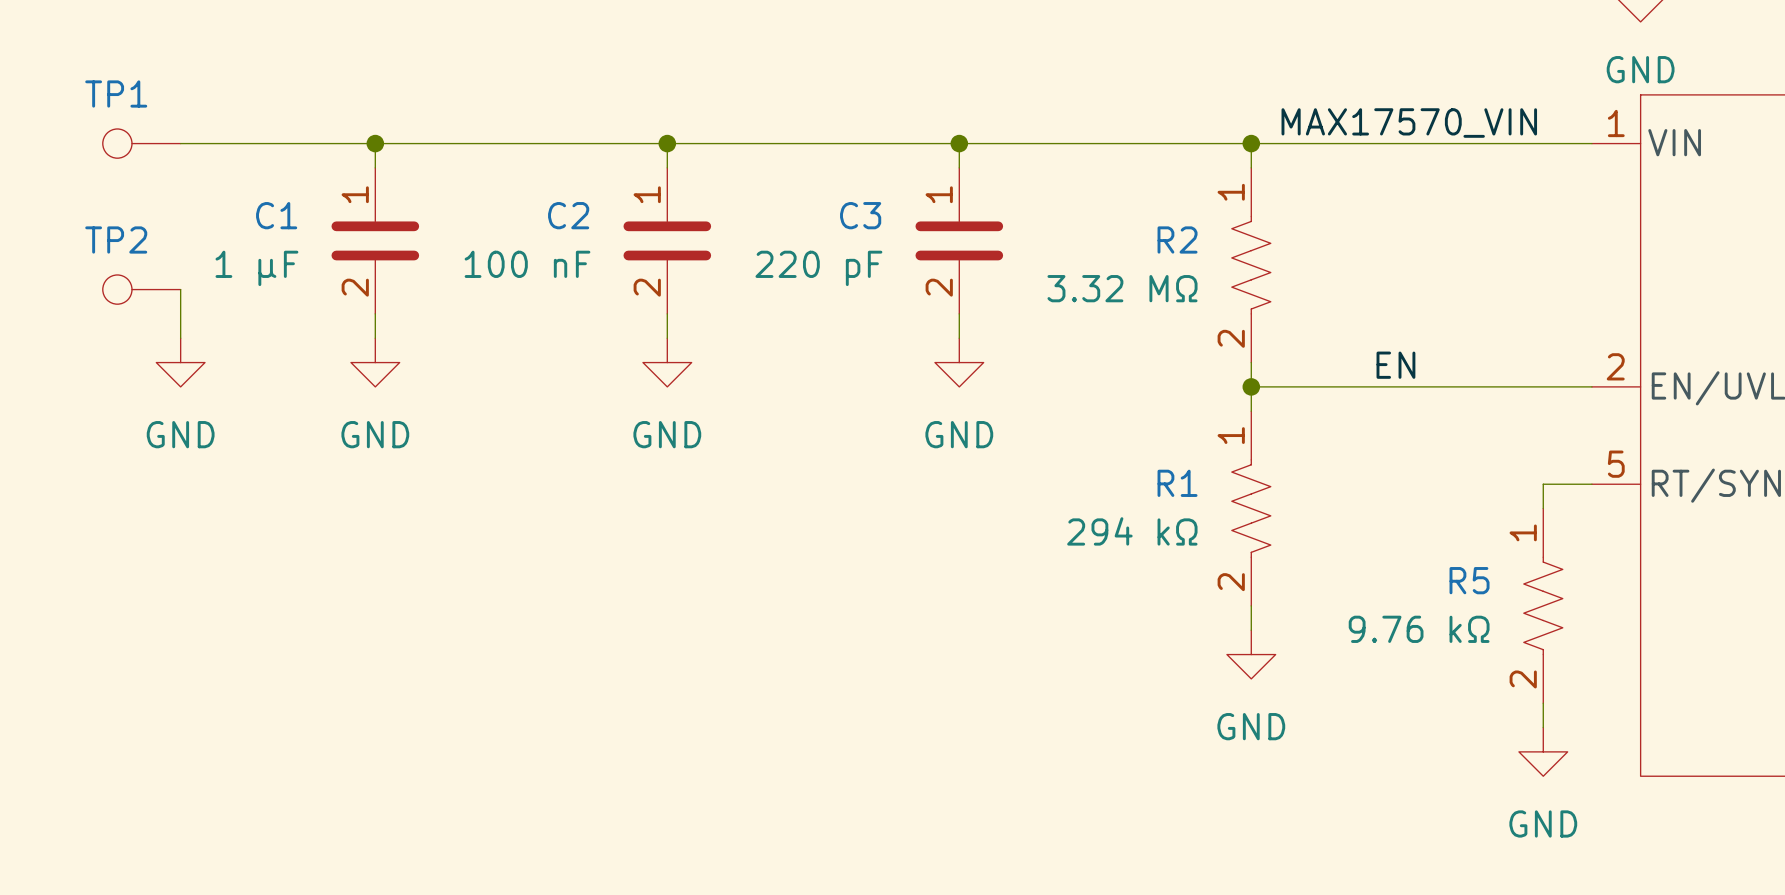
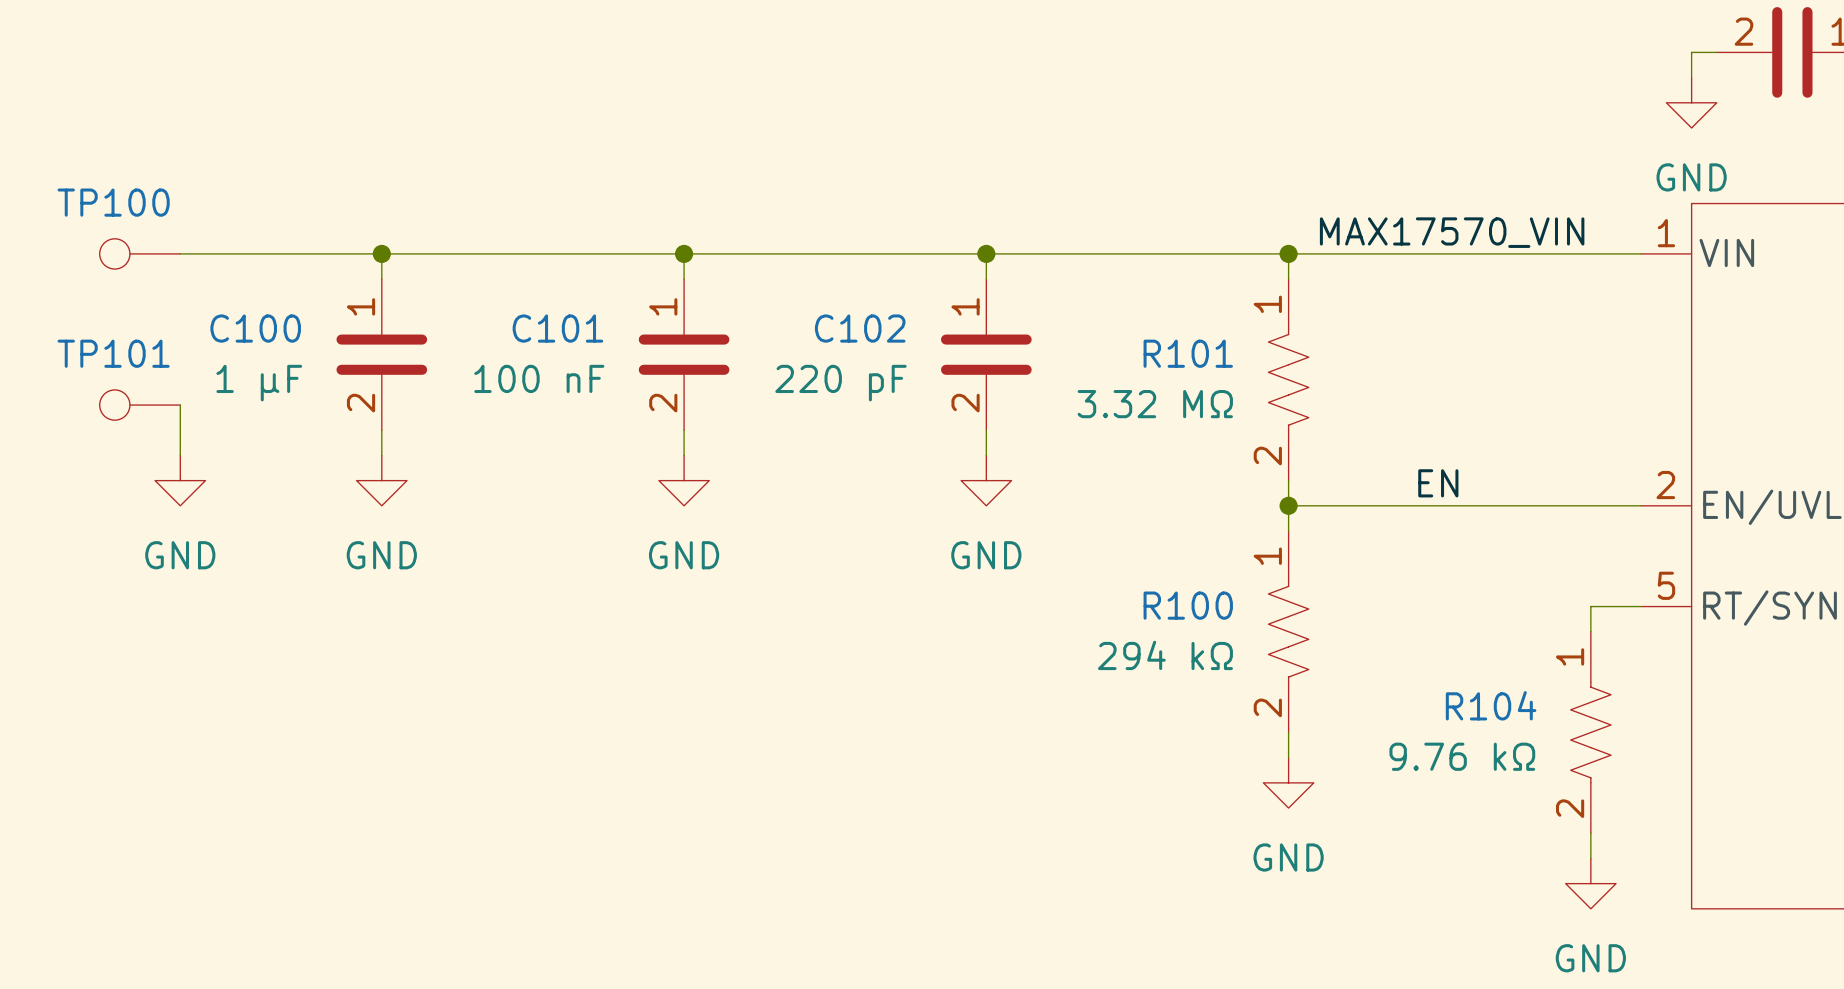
TP1 name: TP1 (116, 94) -> TP100 (113, 202)
C1 name: C1 (276, 215) -> C100 (255, 328)
C2 name: C2 (568, 215) -> C101 (557, 328)
C3 name: C3 (860, 215) -> C102 (860, 328)
R2 name: R2 (1177, 239) -> R101 (1188, 353)
TP2 name: TP2 (116, 240) -> TP101 (113, 353)
R1 name: R1 (1177, 483) -> R100 (1188, 605)
R5 name: R5 (1469, 580) -> R104 (1491, 705)

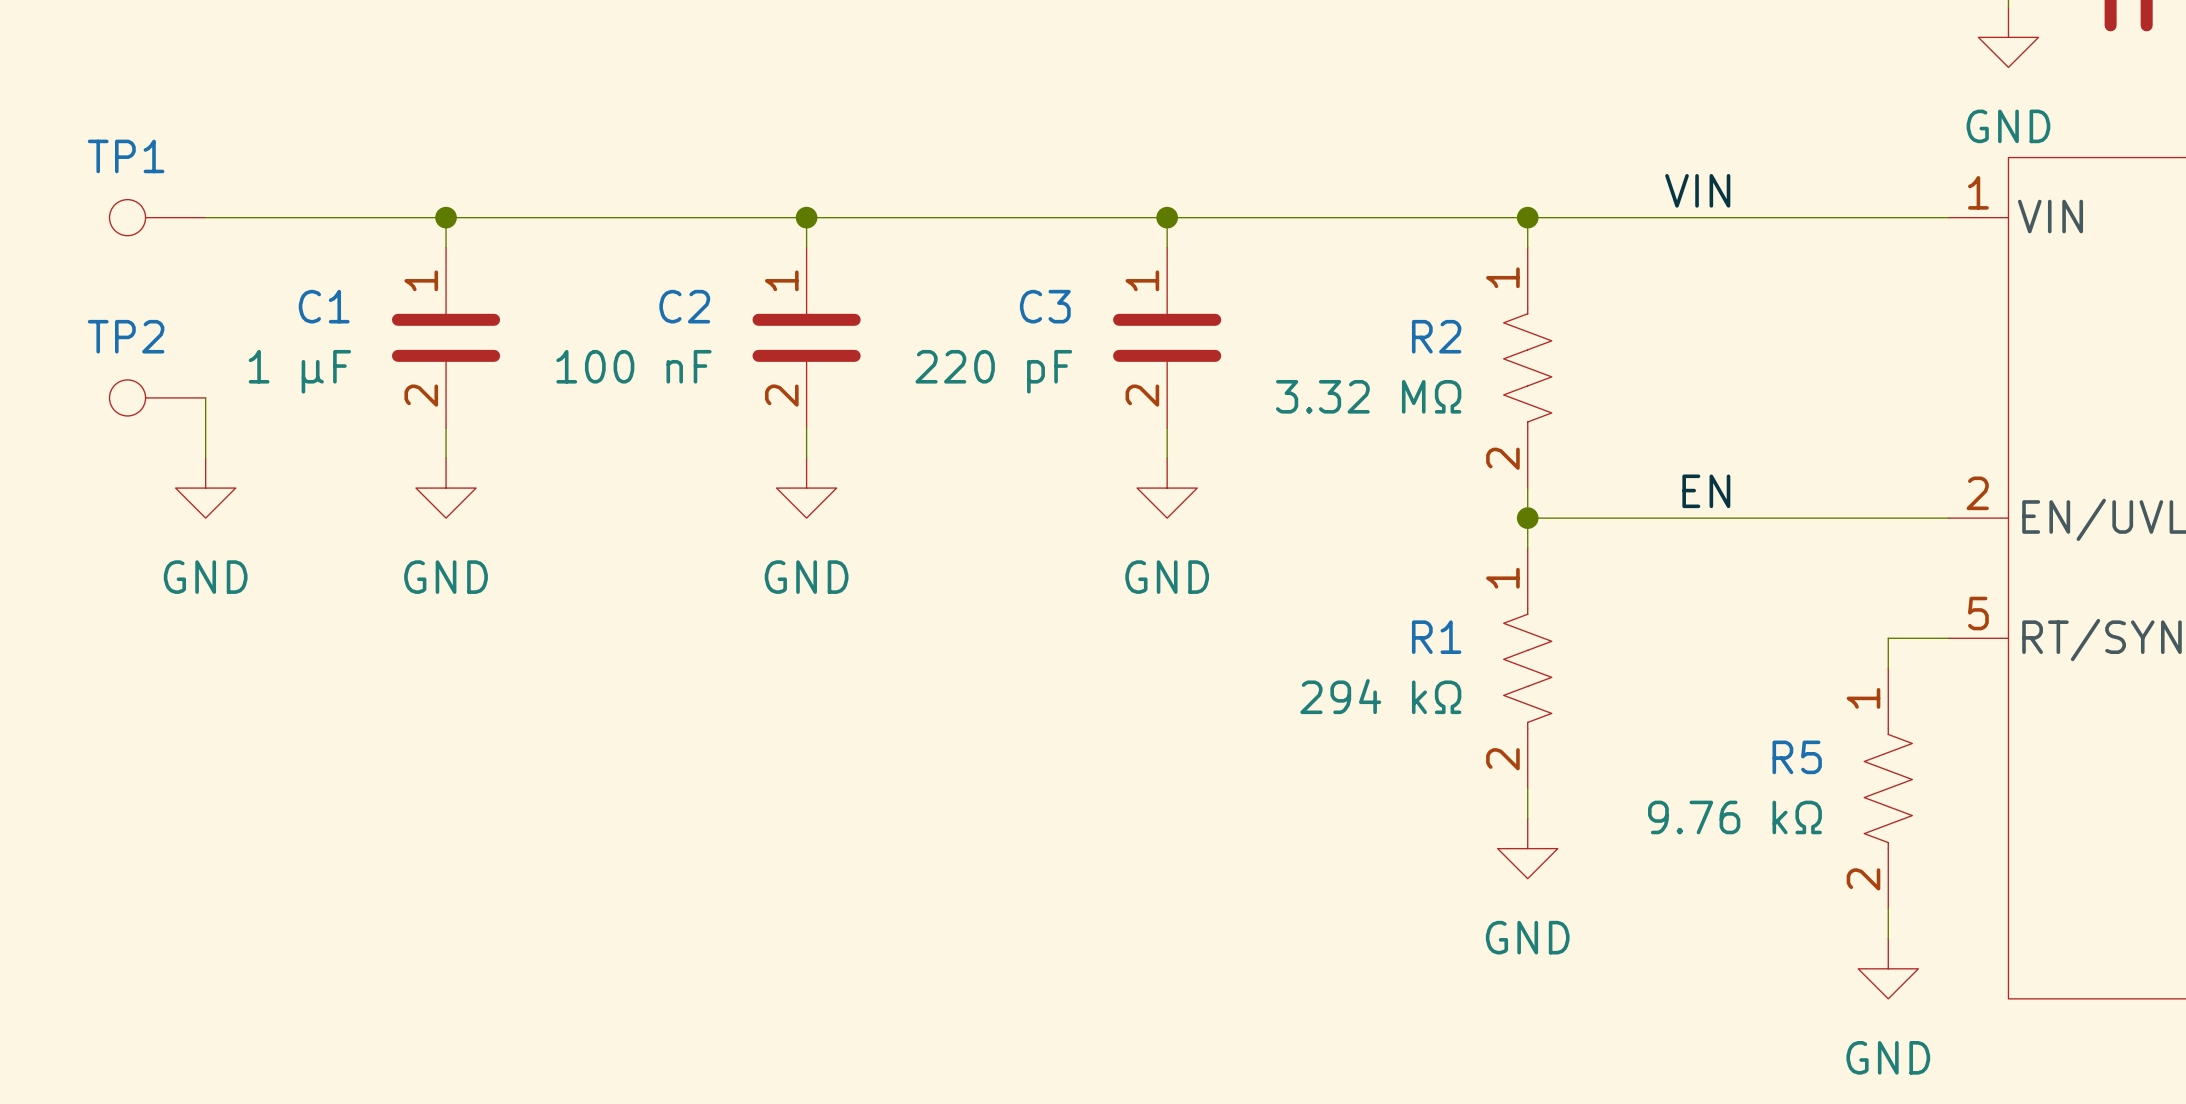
TP100 name: TP100 (113, 202) -> TP1 (126, 156)
label: none -> VIN (1697, 190)
label: MAX17570_VIN (1452, 232) -> none
C100 name: C100 (255, 328) -> C1 (324, 306)
C101 name: C101 (557, 328) -> C2 (684, 306)
C102 name: C102 (860, 328) -> C3 (1045, 306)
TP101 name: TP101 (113, 353) -> TP2 (126, 336)
R101 name: R101 (1188, 353) -> R2 (1436, 336)
R100 name: R100 (1188, 605) -> R1 (1436, 637)
R104 name: R104 (1491, 705) -> R5 (1797, 757)

